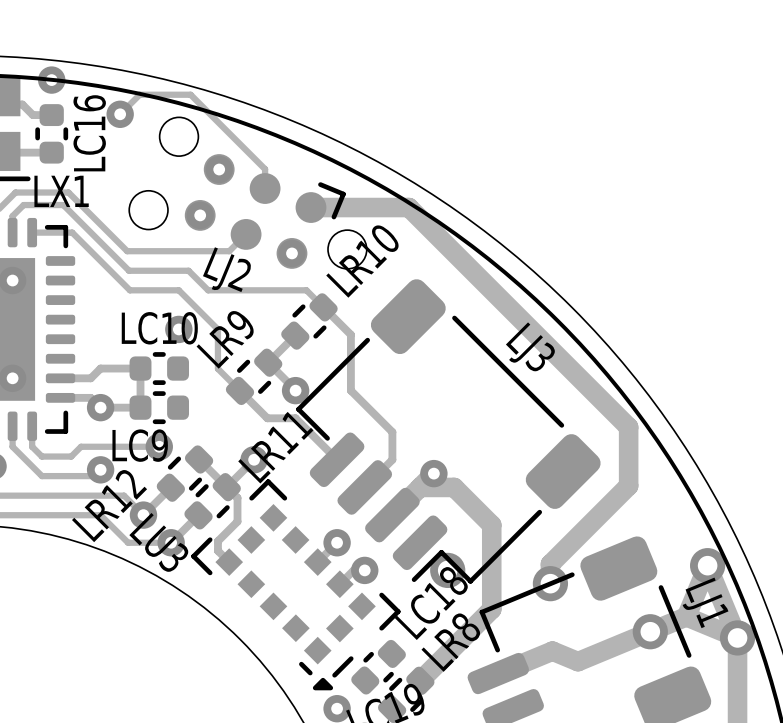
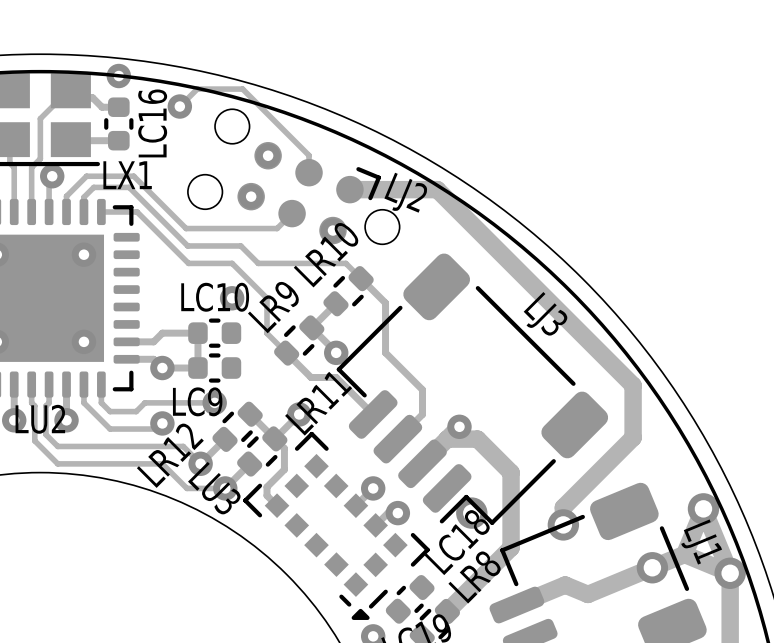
LR10 name position: LR10 (362, 261) -> LR10 (326, 254)
LJ2 name position: LJ2 (227, 269) -> LJ2 (406, 192)

